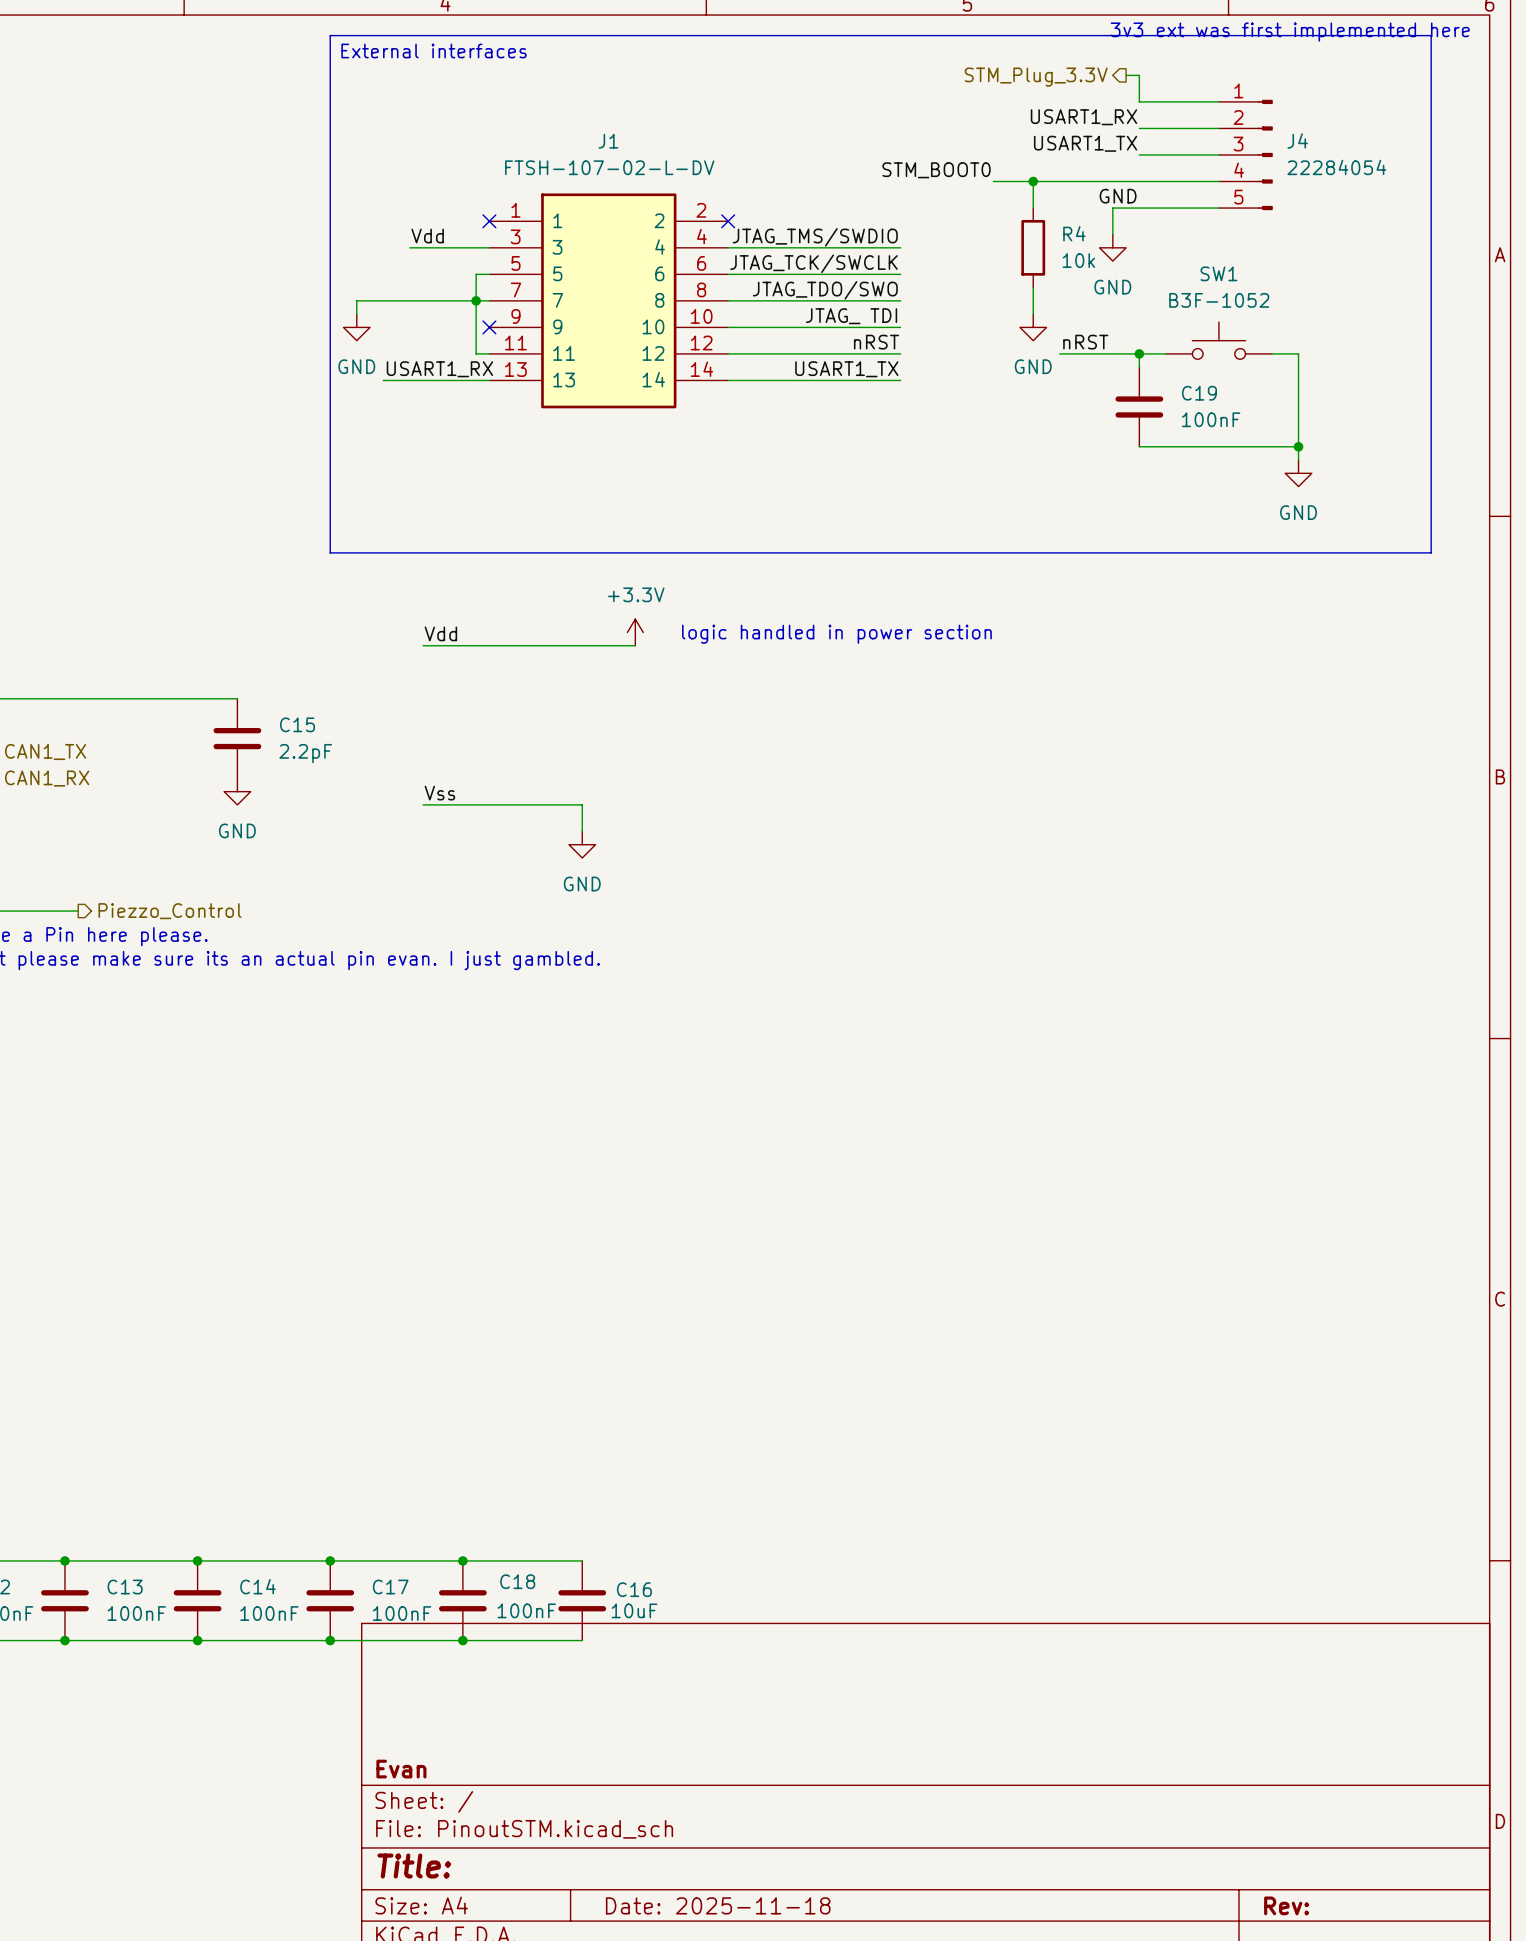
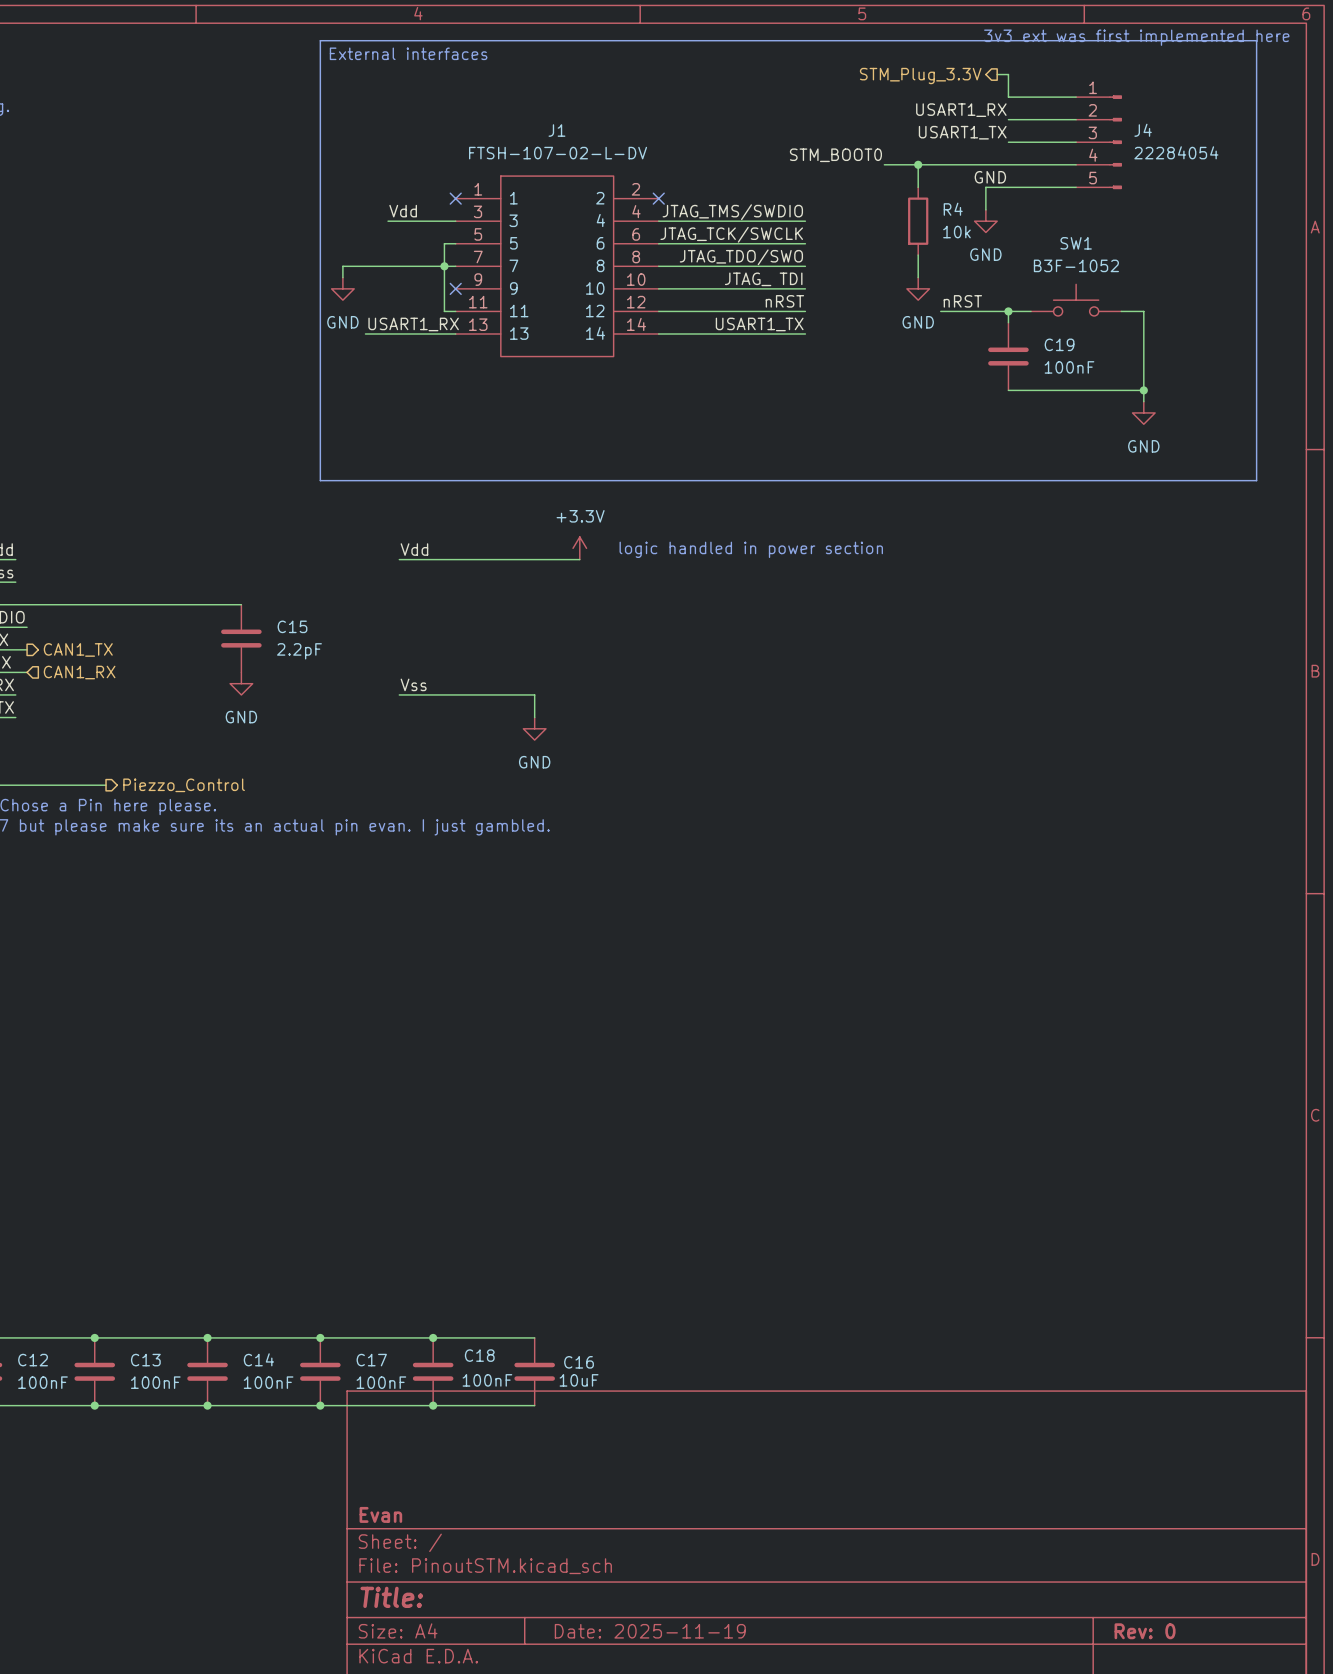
J1 symbol: [489, 193, 729, 409] -> [455, 175, 659, 358]
title block: Date: 2025-11-18 (718, 1905) -> Date: 2025-11-19 (650, 1631)
title block: Rev: (1286, 1905) -> Rev: 0 (1145, 1631)

